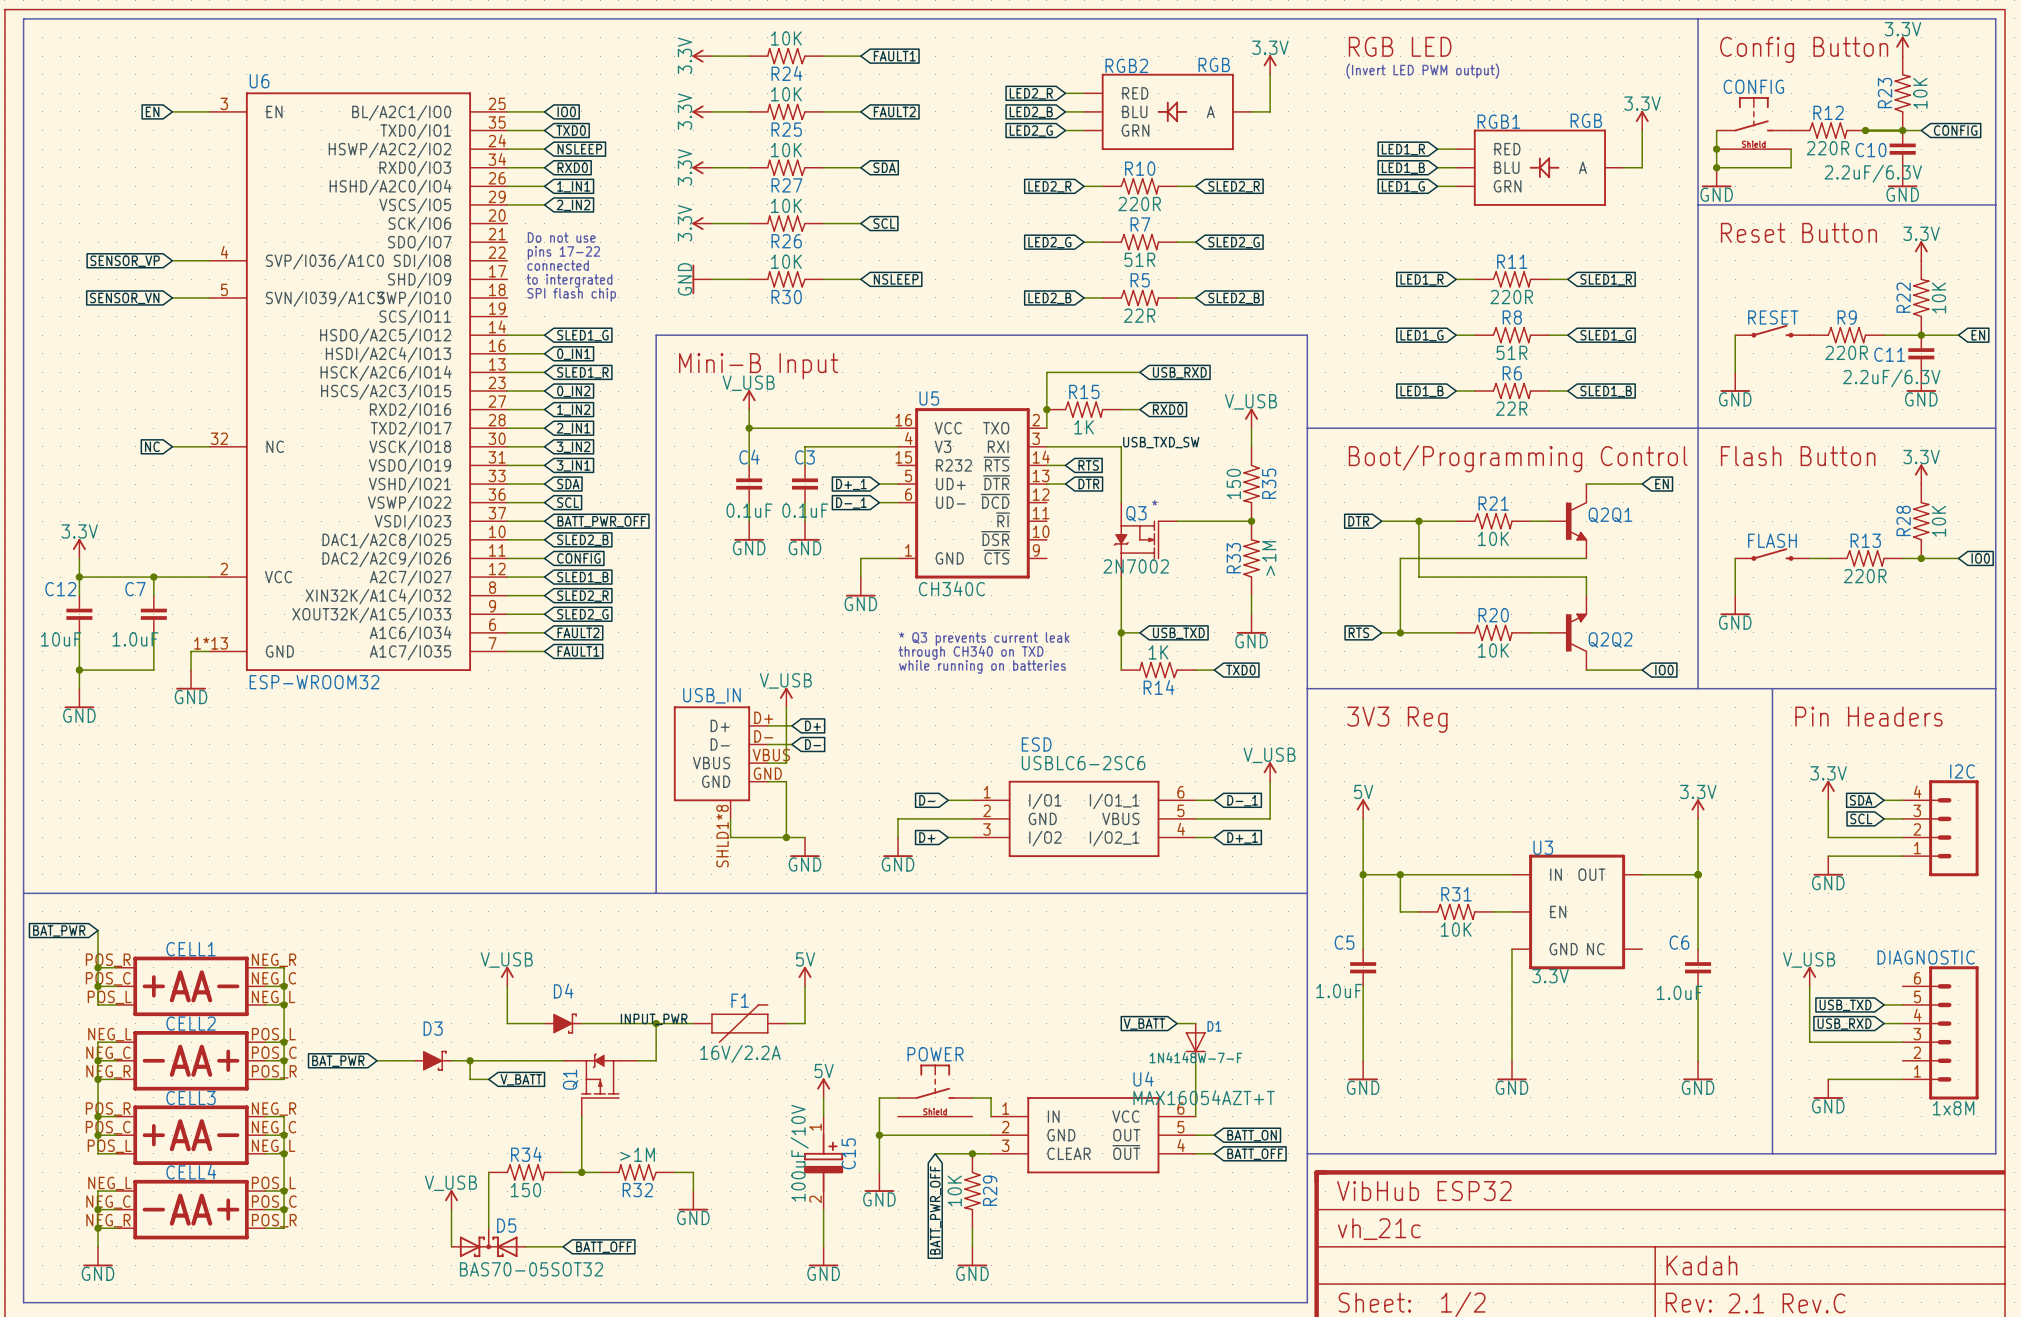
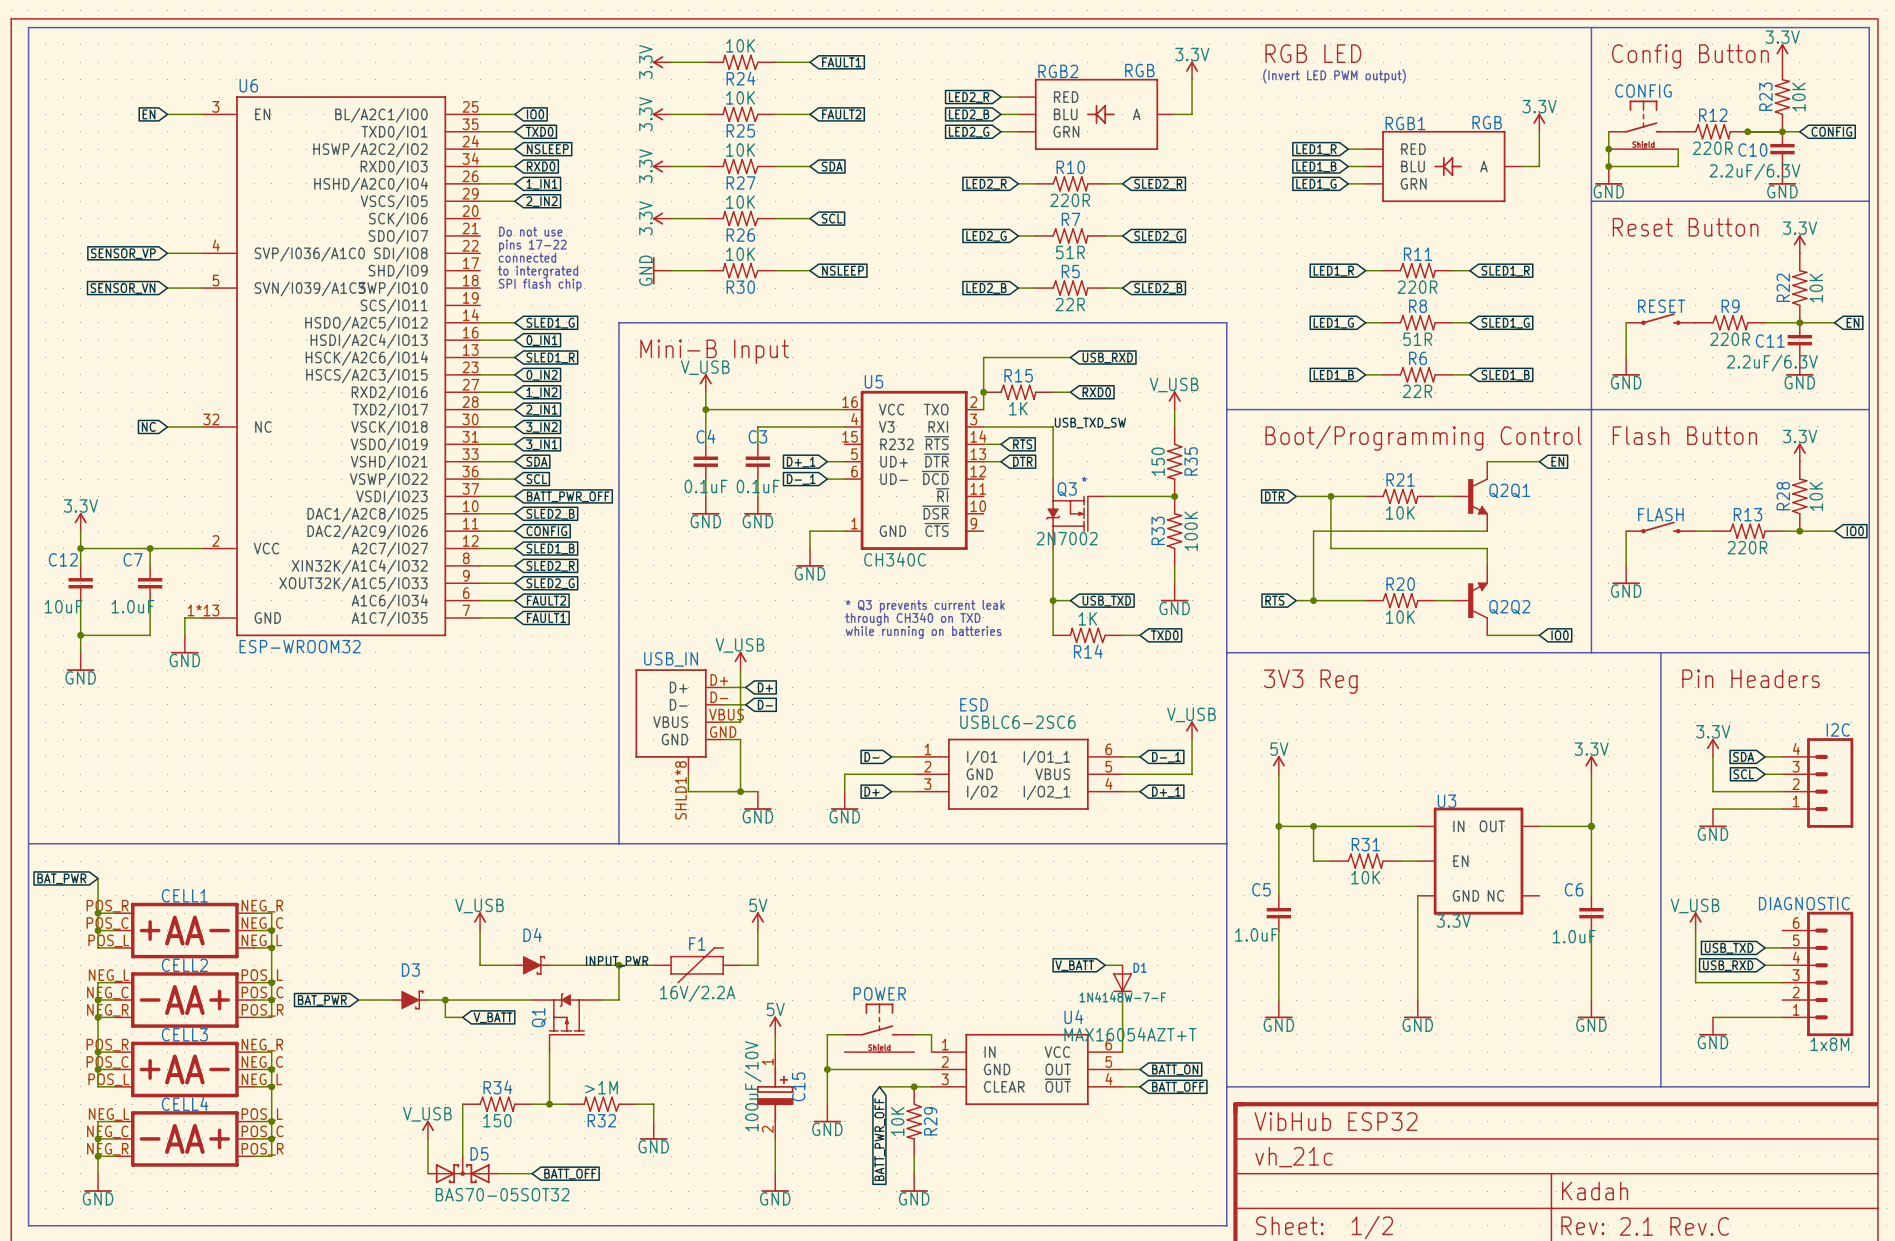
R33 value: >1M (1269, 558) -> 100K (1191, 531)

